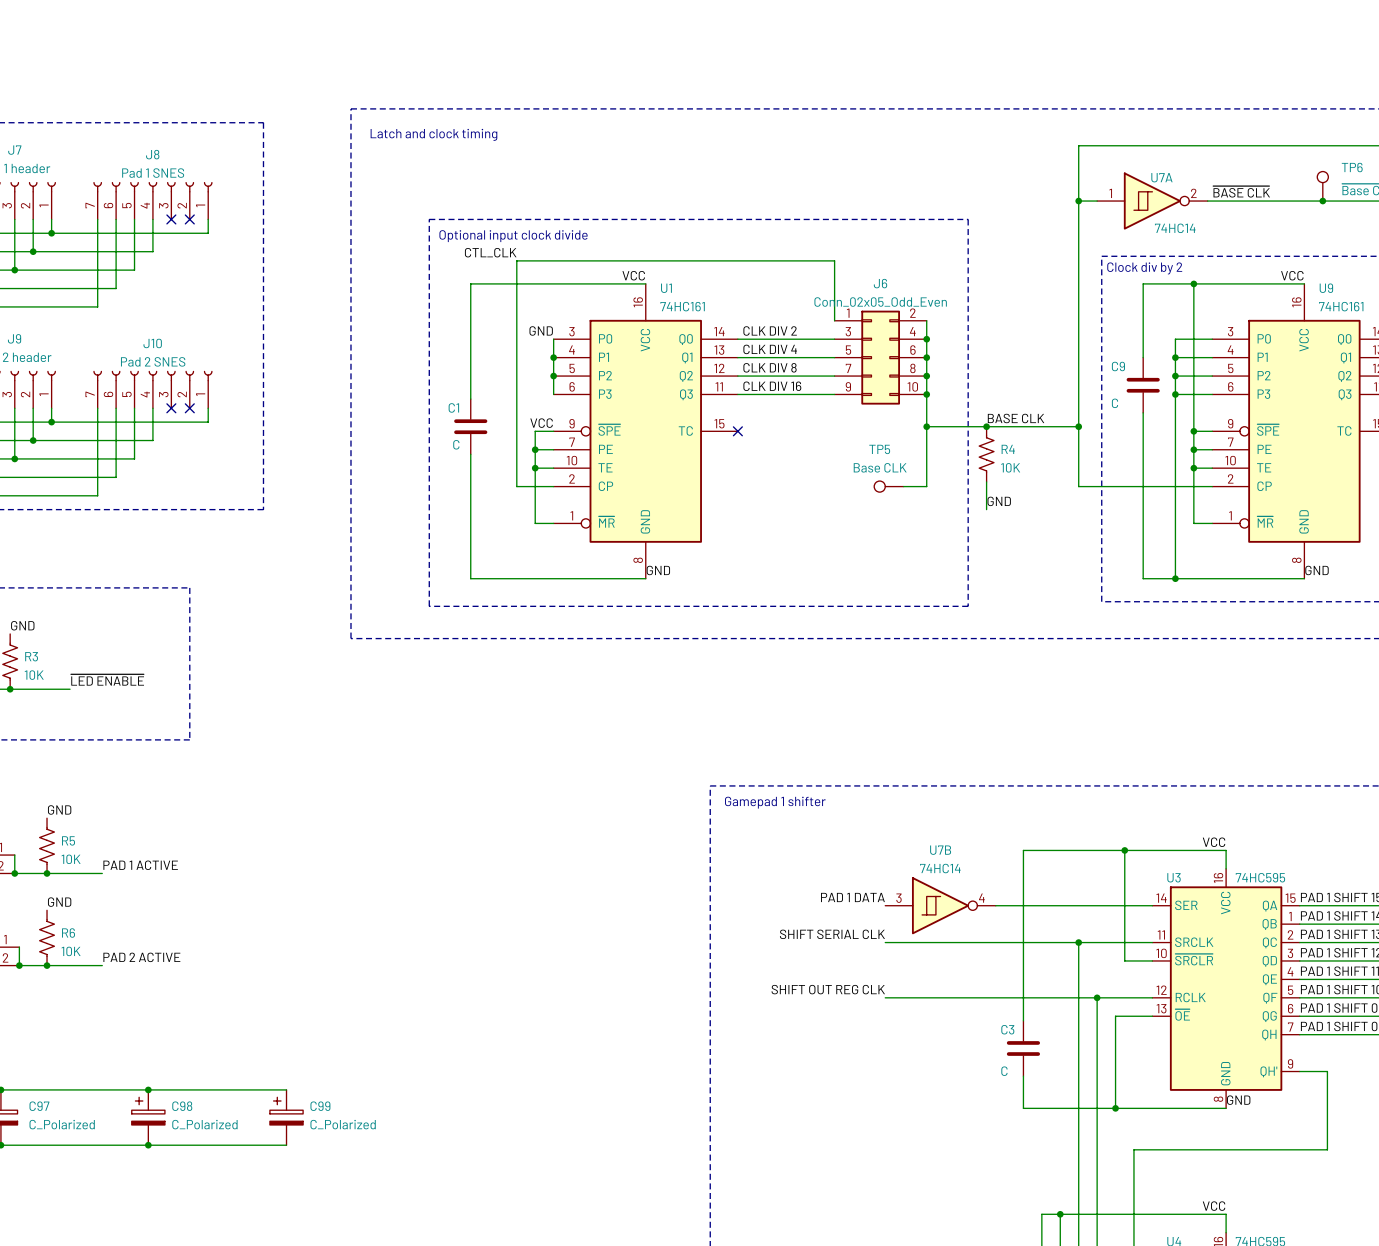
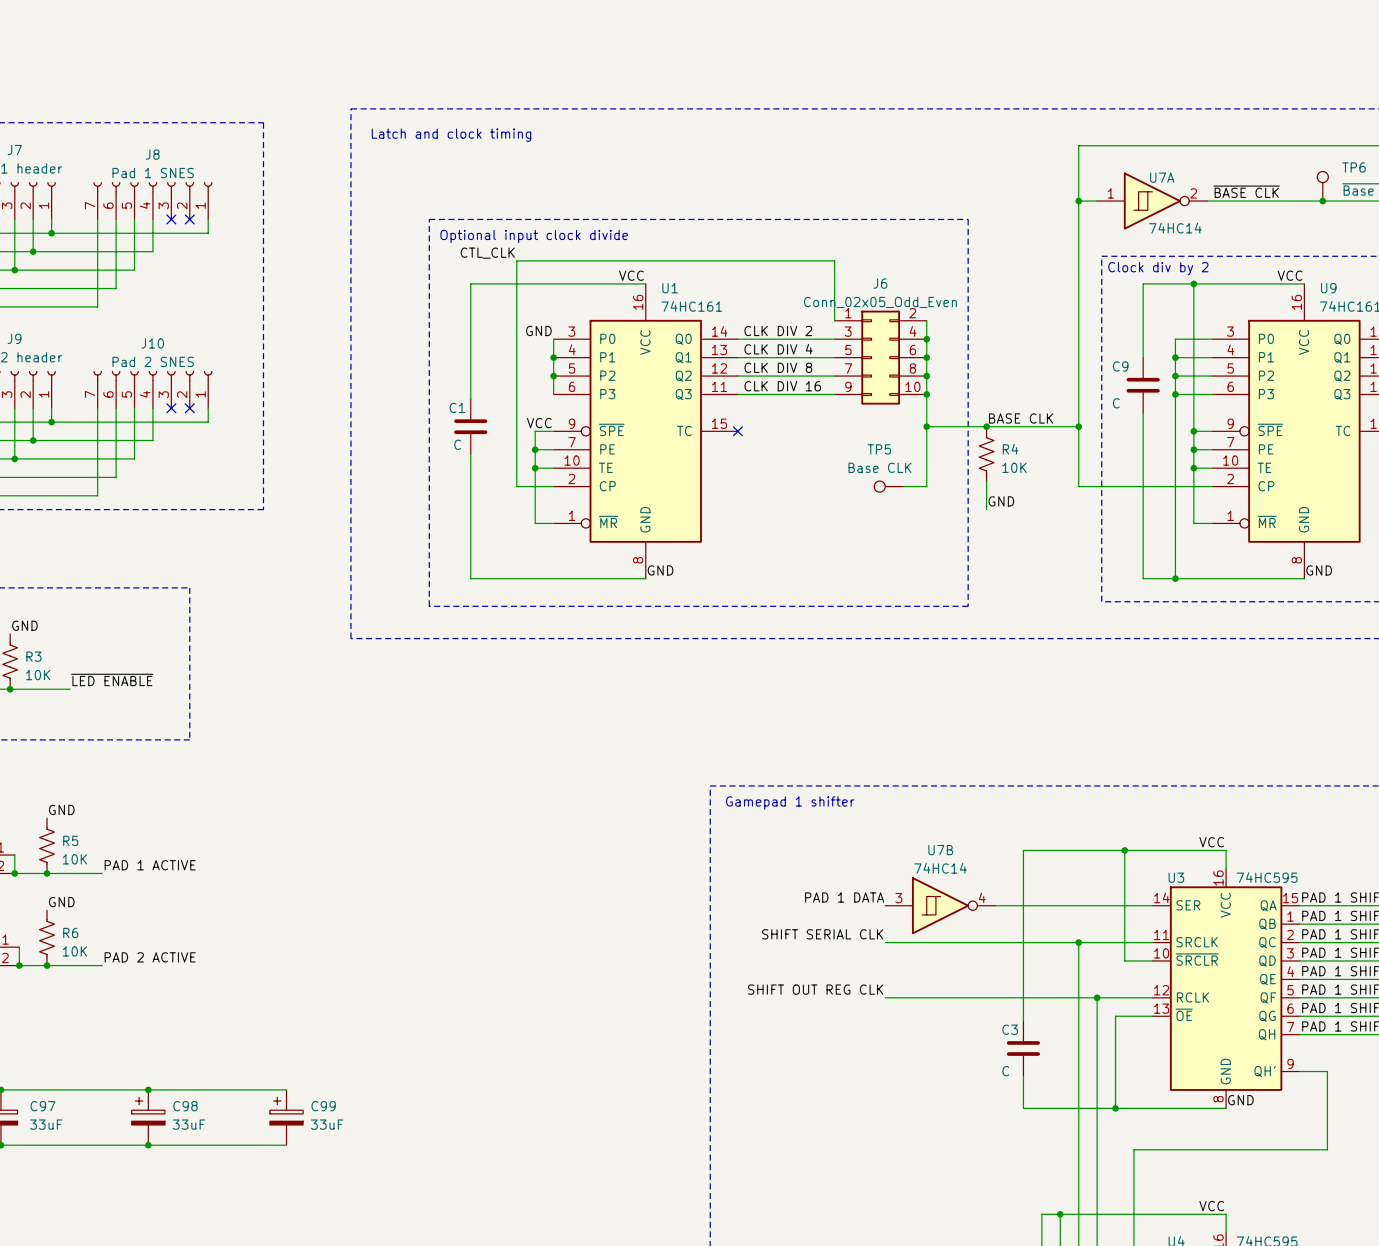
C97 value: C_Polarized (62, 1124) -> 33uF (46, 1124)
C98 value: C_Polarized (204, 1124) -> 33uF (188, 1124)
C99 value: C_Polarized (343, 1124) -> 33uF (327, 1124)

